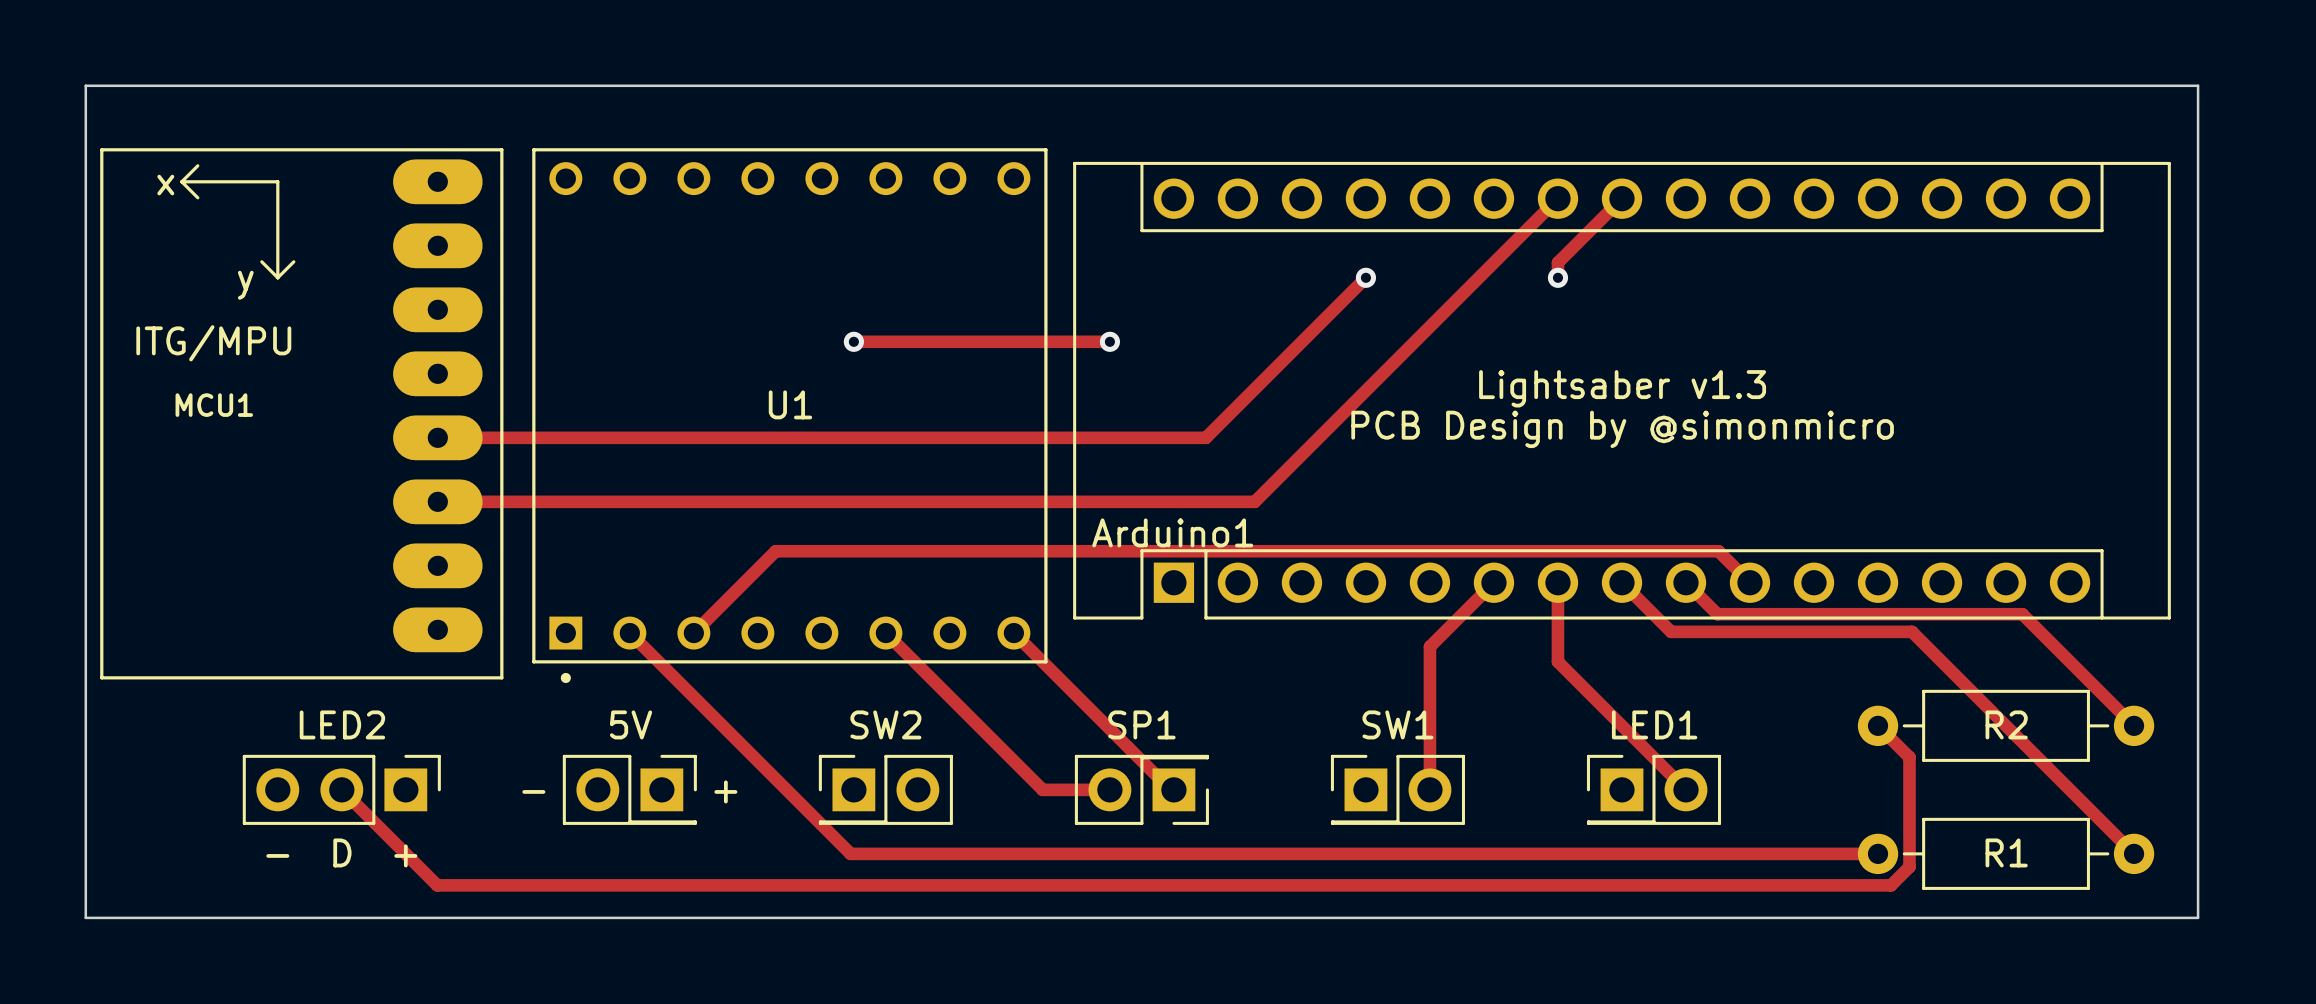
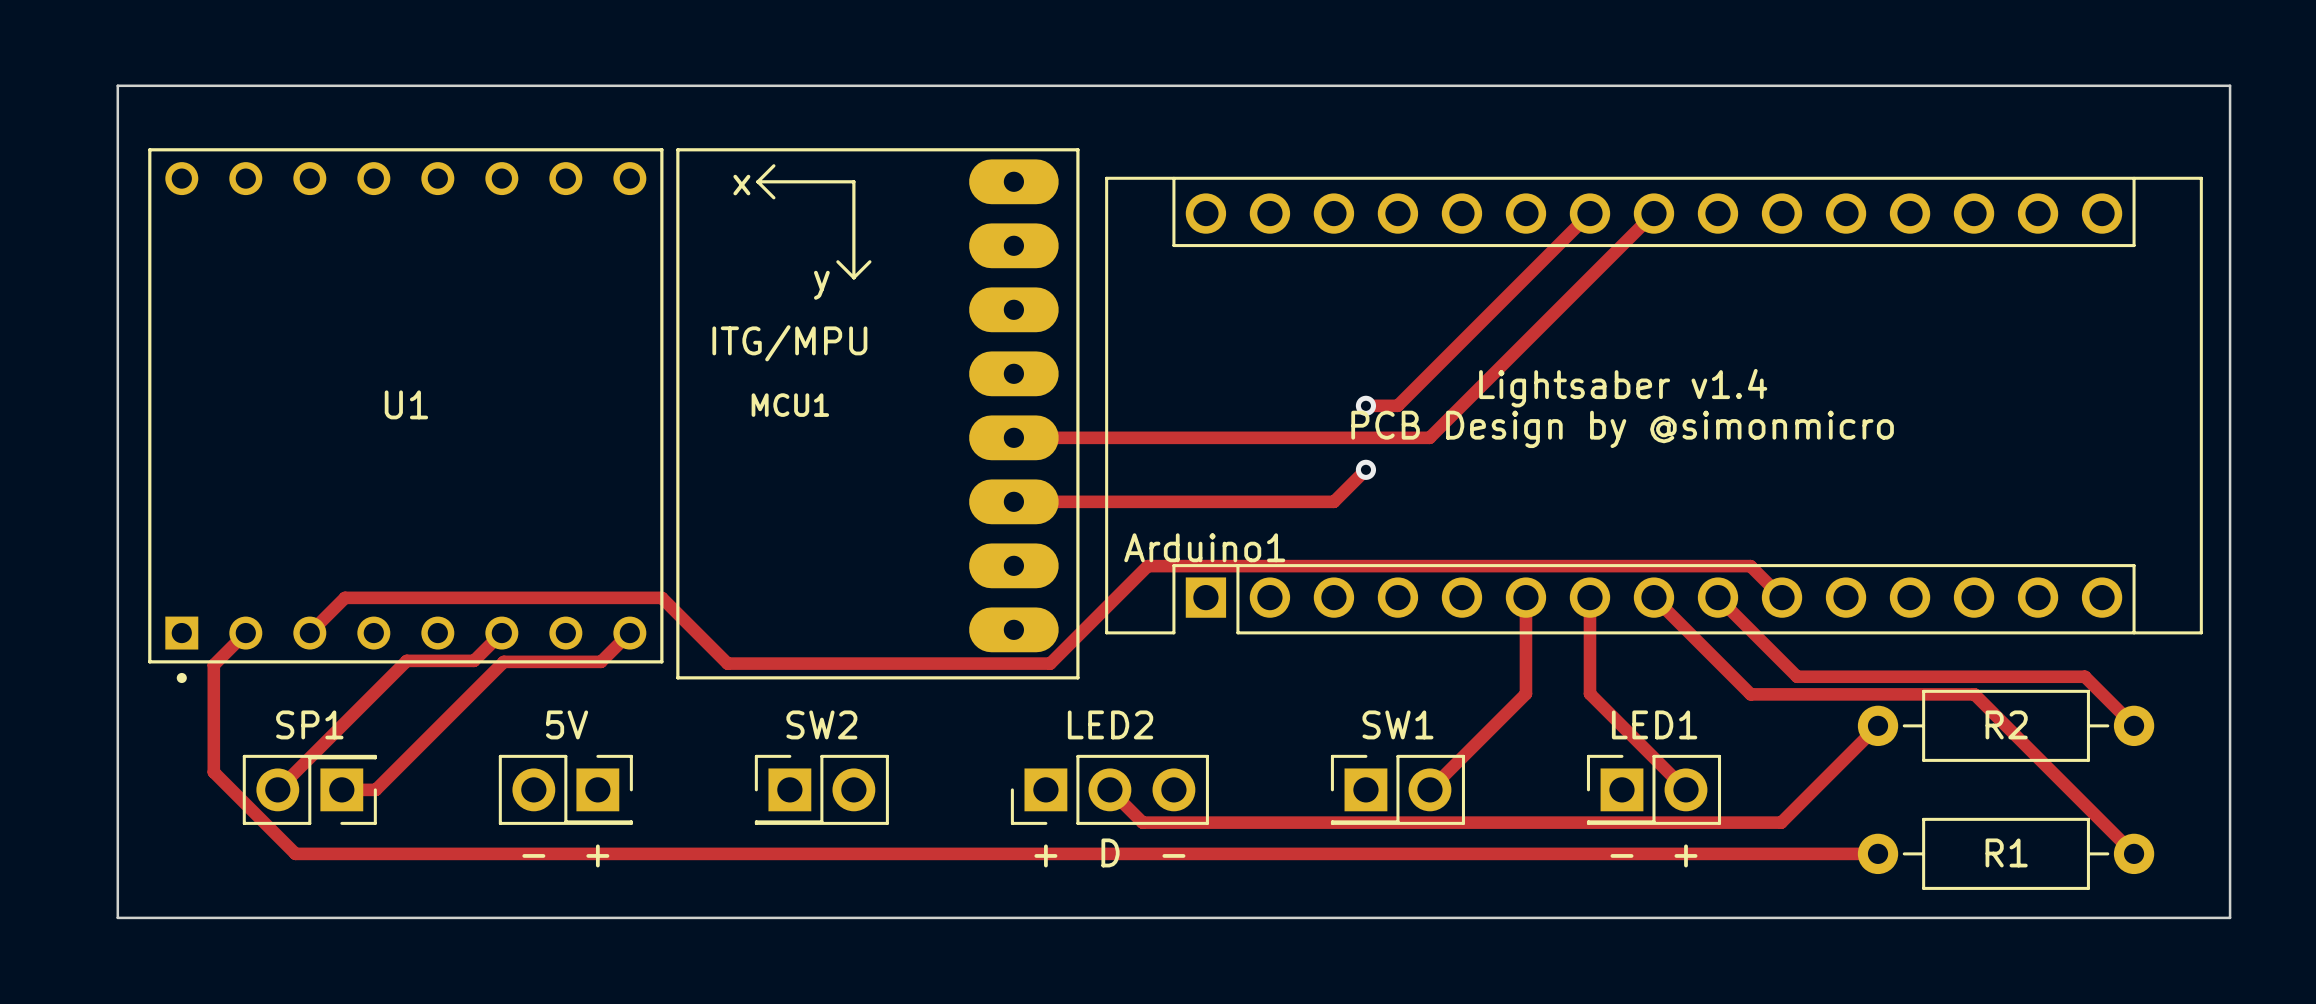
board edge: (117, 85) (85, 85) (85, 917) (117, 917) -> (117, 85) (117, 917)
board edge: (2198, 85) (2198, 917) -> (2198, 85) (2230, 85) (2230, 917) (2198, 917)
track: (1557, 198) (1254, 501) -> (1365, 469) (1333, 501) (1254, 501)
track: (1621, 198) (1557, 262) (1557, 277) -> none
track: none -> (1589, 213) (1397, 405) (1365, 405)
track: (1365, 277) (1205, 437) -> (1653, 213) (1429, 437) (1205, 437)
via: (1365, 277) -> none
via: (1557, 277) -> none
track: (853, 341) (1109, 341) -> none
via: (853, 341) -> none
via: (1109, 341) -> none
text: Lightsaber v1.3 (1622, 388) -> Lightsaber v1.4 (1623, 388)
Arduino1 position: (1621, 390) -> (1653, 405)
via: none -> (1365, 405)
MCU1 position: (301, 413) -> (877, 413)
U1 position: (789, 415) -> (405, 415)
track: (437, 437) (1013, 437) -> none
via: none -> (1365, 469)
track: (437, 501) (1013, 501) -> none
track: (1493, 582) (1429, 646) (1429, 789) -> (1525, 597) (1525, 693) (1429, 789)
track: (1557, 582) (1557, 661) (1589, 693) -> (1589, 597) (1589, 693)
track: (1621, 582) (1671, 631) (1912, 631) (1974, 694) -> (1653, 597) (1750, 694) (1974, 694)
track: (1685, 582) (1717, 614) (2022, 614) (2084, 676) -> (1718, 597) (1797, 676) (2084, 676)
track: (1750, 582) (1718, 551) (775, 551) (693, 633) -> none
track: none -> (1782, 597) (1750, 566) (1147, 566) (1050, 663) (727, 663) (661, 597) (345, 597) (309, 633)
track: none -> (501, 633) (474, 660) (406, 660) (277, 789)
track: (629, 633) (850, 853) -> (245, 633) (213, 665) (213, 772) (295, 853) (850, 853)
track: none -> (629, 633) (601, 661) (503, 661) (375, 789) (341, 789)
track: (885, 633) (1042, 789) (1109, 789) -> none
track: (1013, 633) (1170, 789) (1173, 789) -> none
track: (1878, 725) (1909, 757) (1909, 866) (1891, 885) (437, 885) (341, 789) -> (1878, 725) (1781, 822) (1142, 822) (1109, 789)
LED2 rotation: 0° (341, 789) -> 180° (1109, 789)
LED2 position: (341, 789) -> (1109, 789)
5V position: (629, 789) -> (565, 789)
SW2 position: (885, 789) -> (821, 789)
SP1 position: (1141, 789) -> (309, 789)
text position: - (533, 791) -> - (533, 855)
text: + (725, 791) -> none
text: D (342, 852) -> none
text: none -> D (1110, 852)
text: - (277, 855) -> none
text: + (405, 855) -> none
text: none -> + (597, 855)
text: none -> + (1045, 855)
text: none -> - (1173, 855)
text: none -> - (1621, 855)
text: none -> + (1685, 855)

